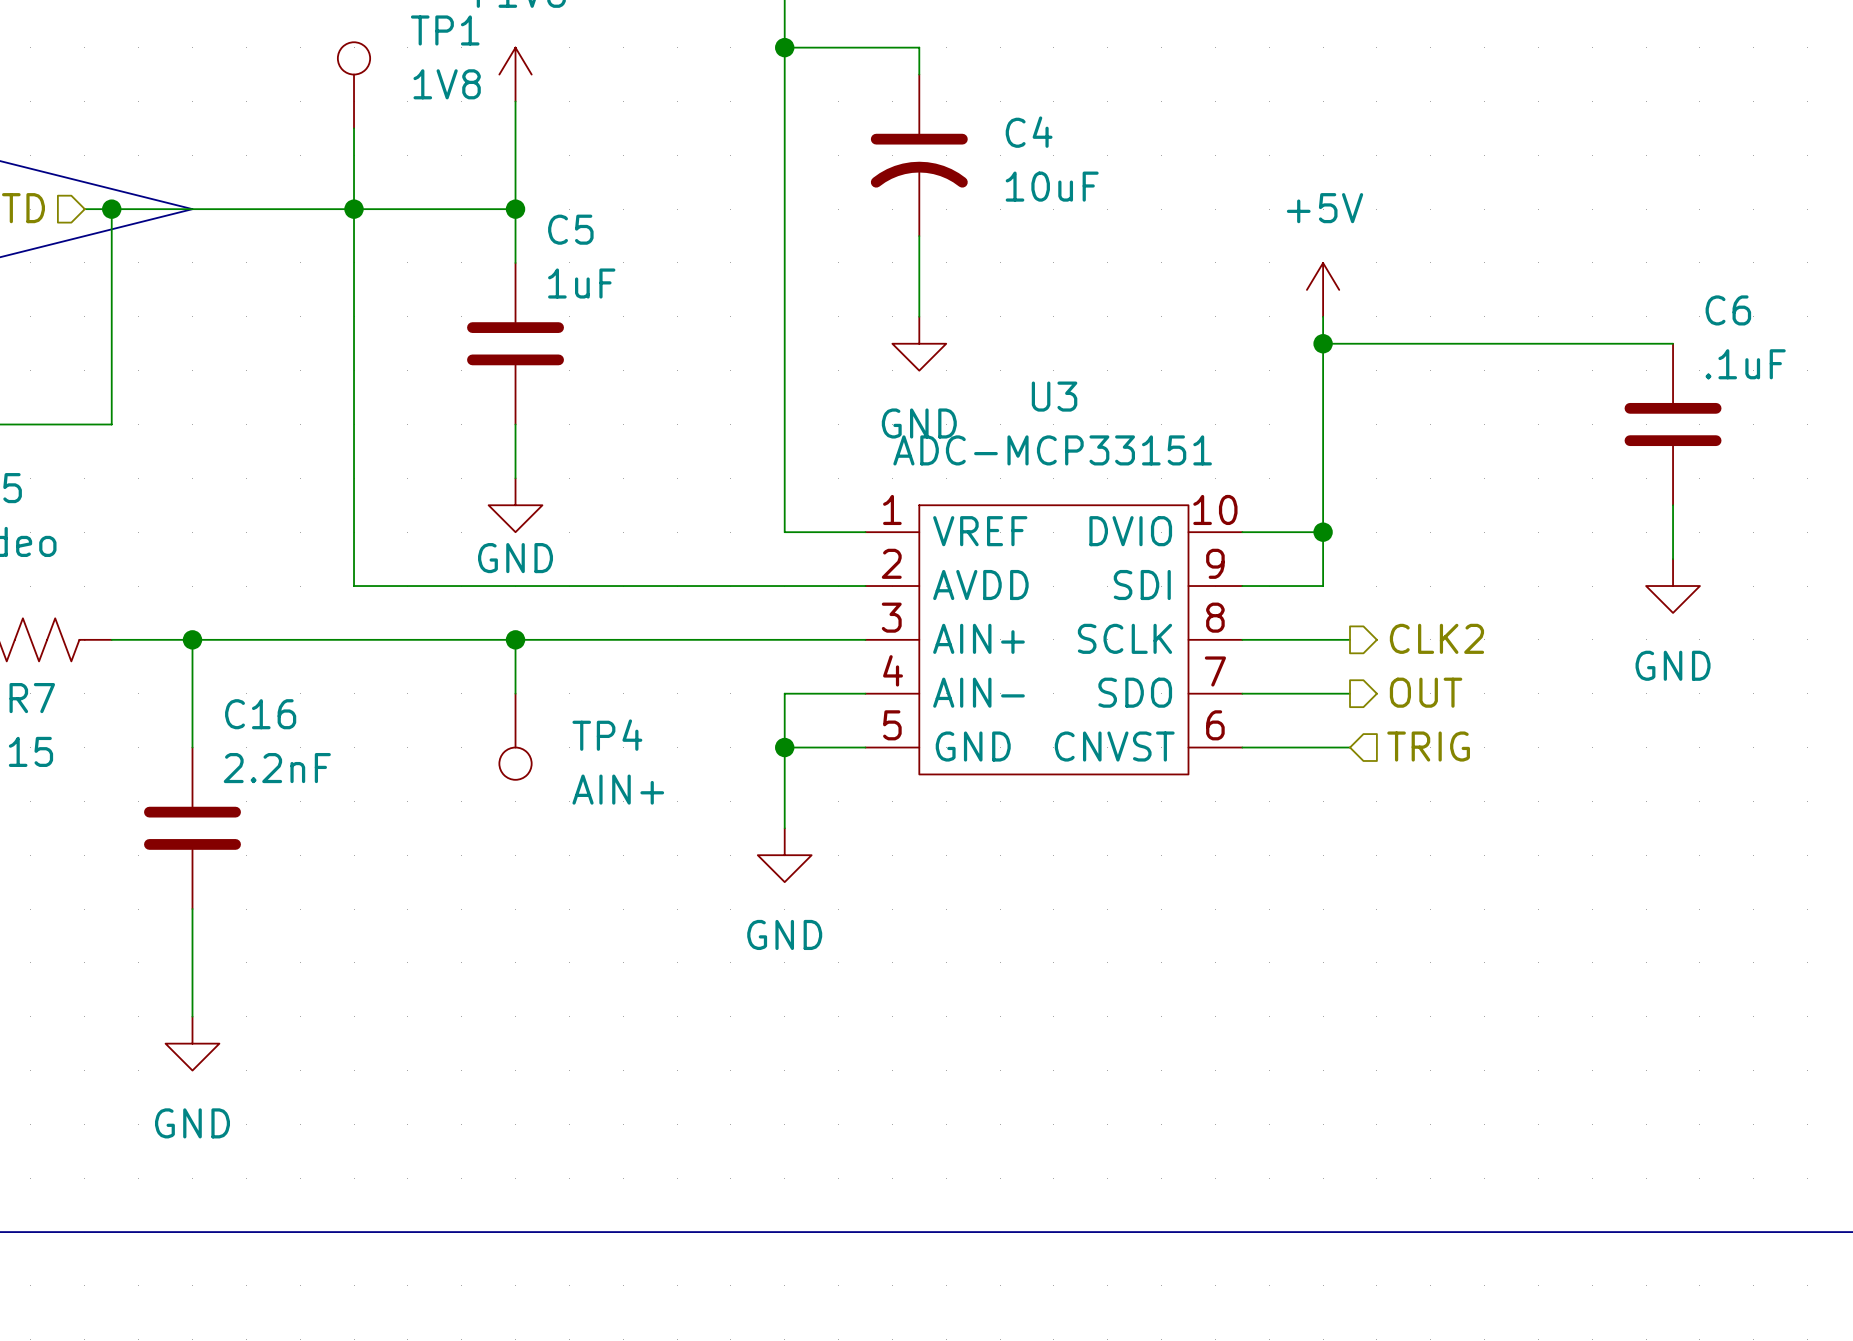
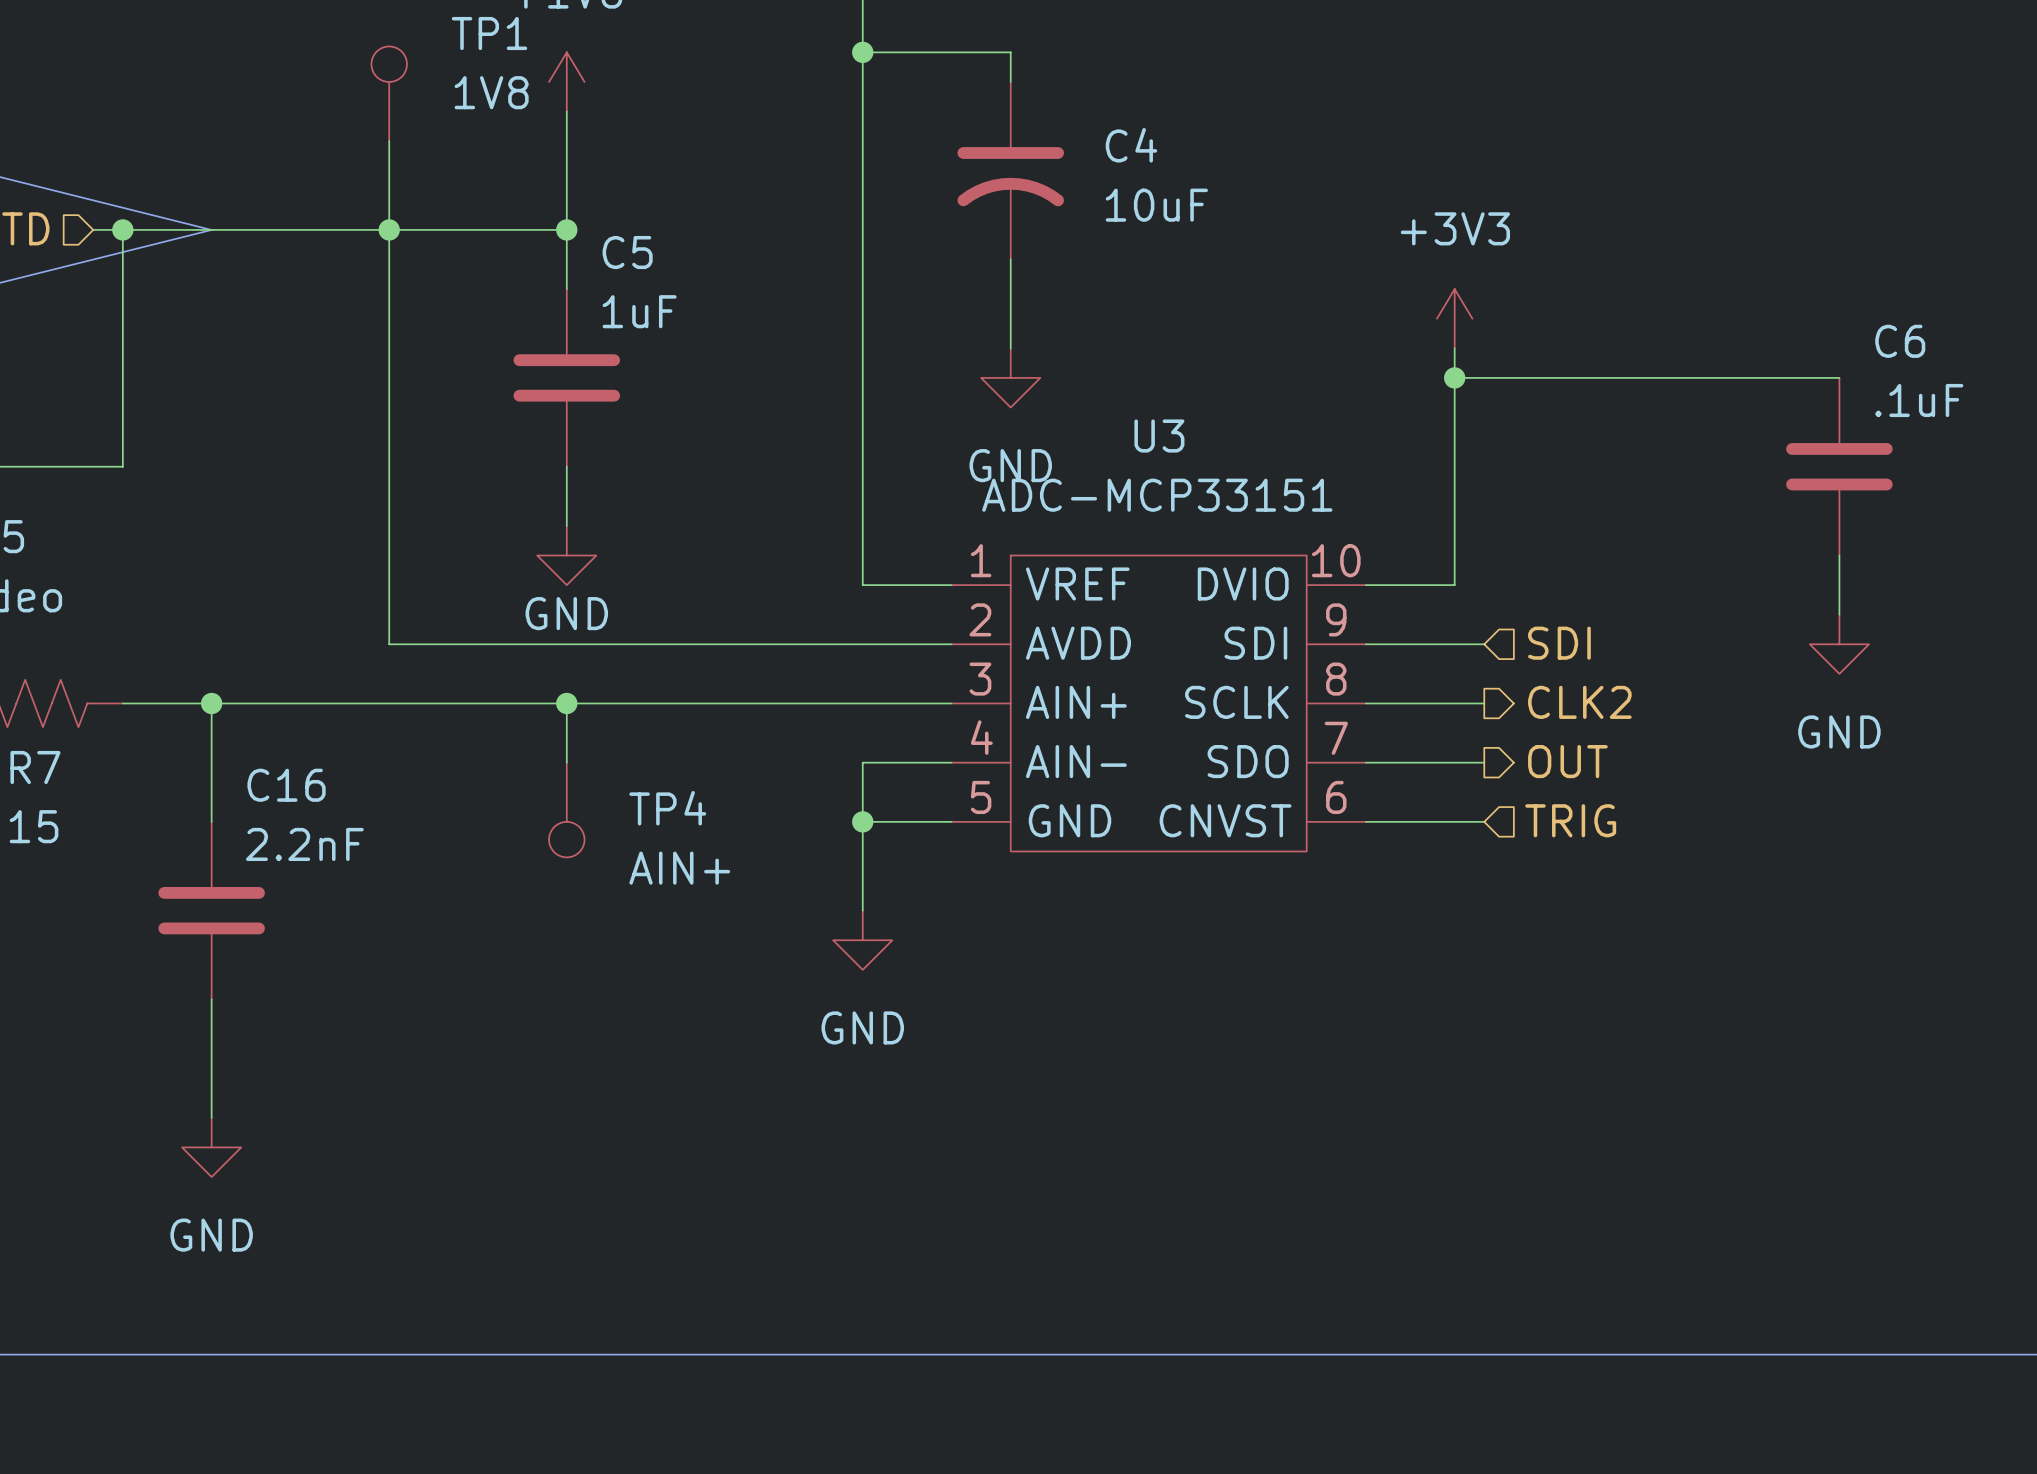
power symbol: +5V (1323, 289) -> +3V3 (1454, 318)
wire: (1323, 532) (1323, 586) -> (1484, 644) (1454, 644)
junction: (1323, 532) -> none
hierarchical label: none -> SDI (1559, 643)

